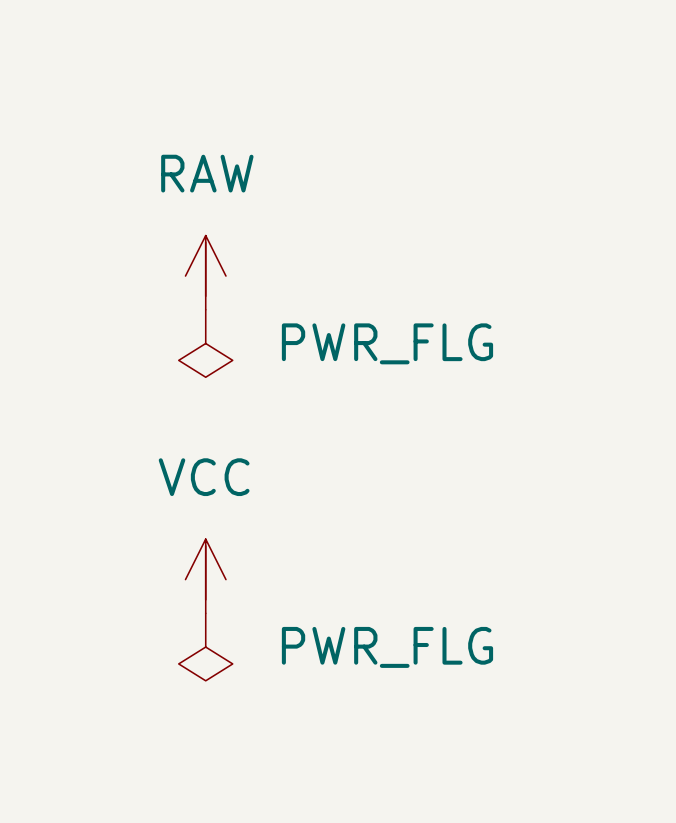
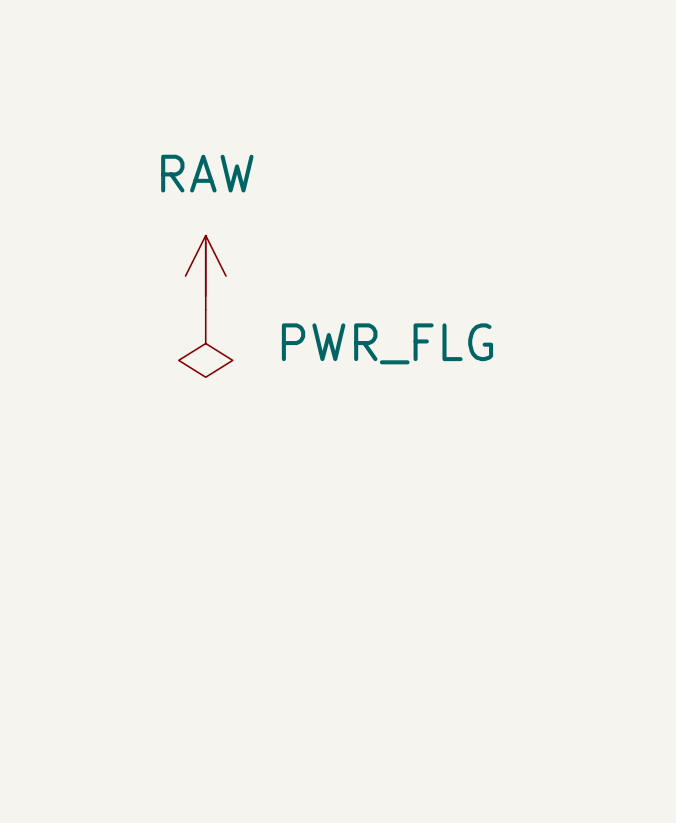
power symbol: VCC (205, 576) -> none
power symbol: PWR_FLG (205, 647) -> none

